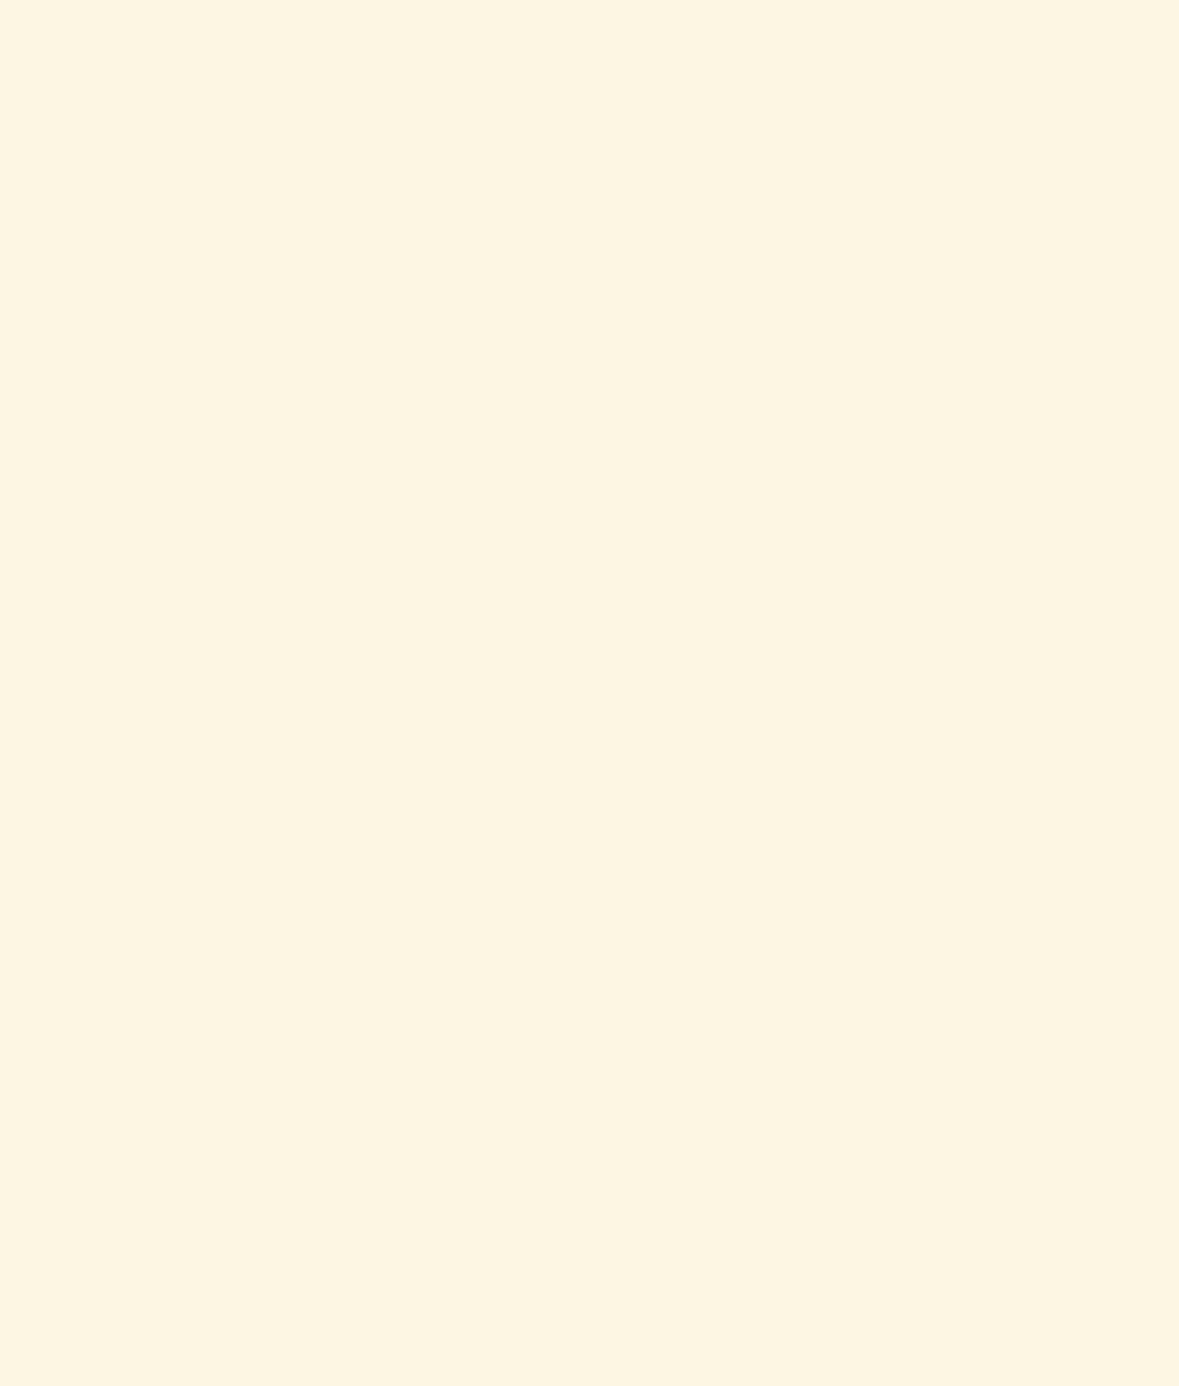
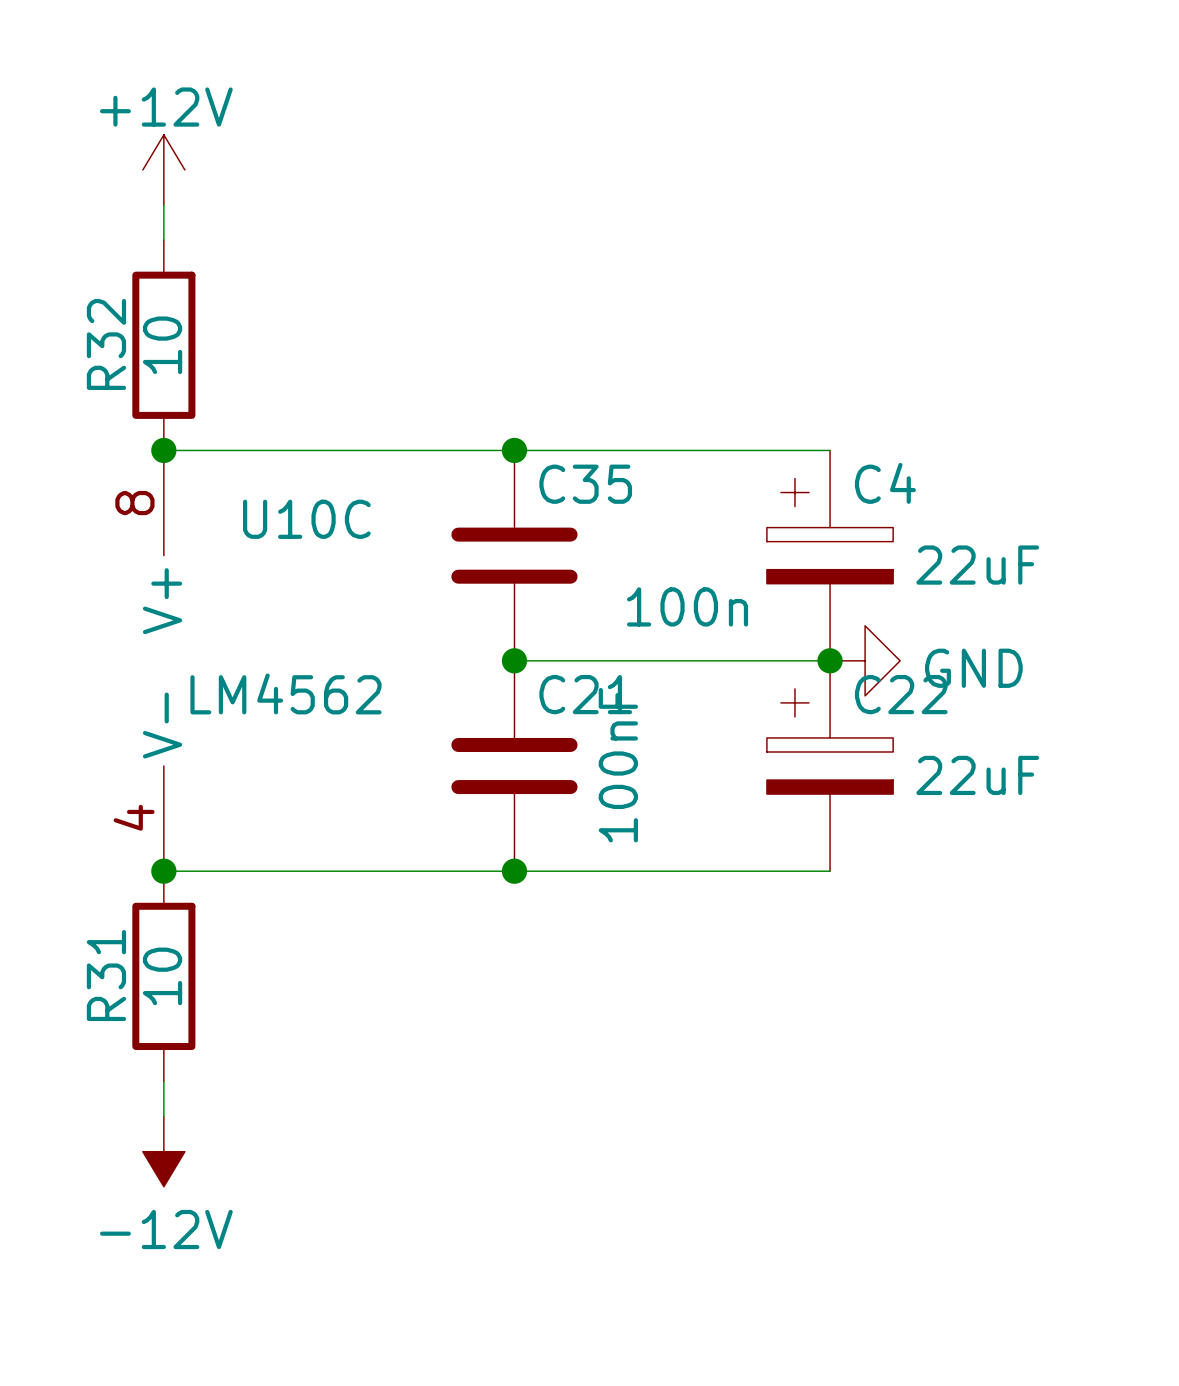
power symbol: none -> +12V (163, 169)
wire: none -> (163, 205) (163, 240)
R32: none -> 10 (163, 345)
wire: none -> (163, 450) (830, 450)
junction: none -> (163, 450)
junction: none -> (514, 450)
C35: none -> 100n (514, 555)
C4: none -> 22uF (830, 555)
U10C: none -> LM4562 (163, 660)
wire: none -> (514, 660) (830, 660)
junction: none -> (514, 660)
junction: none -> (830, 660)
power symbol: none -> GND (865, 660)
C21: none -> 100nF (514, 766)
C22: none -> 22uF (830, 766)
wire: none -> (163, 871) (830, 871)
junction: none -> (163, 871)
junction: none -> (514, 871)
R31: none -> 10 (163, 976)
wire: none -> (163, 1081) (163, 1116)
power symbol: none -> -12V (163, 1151)

